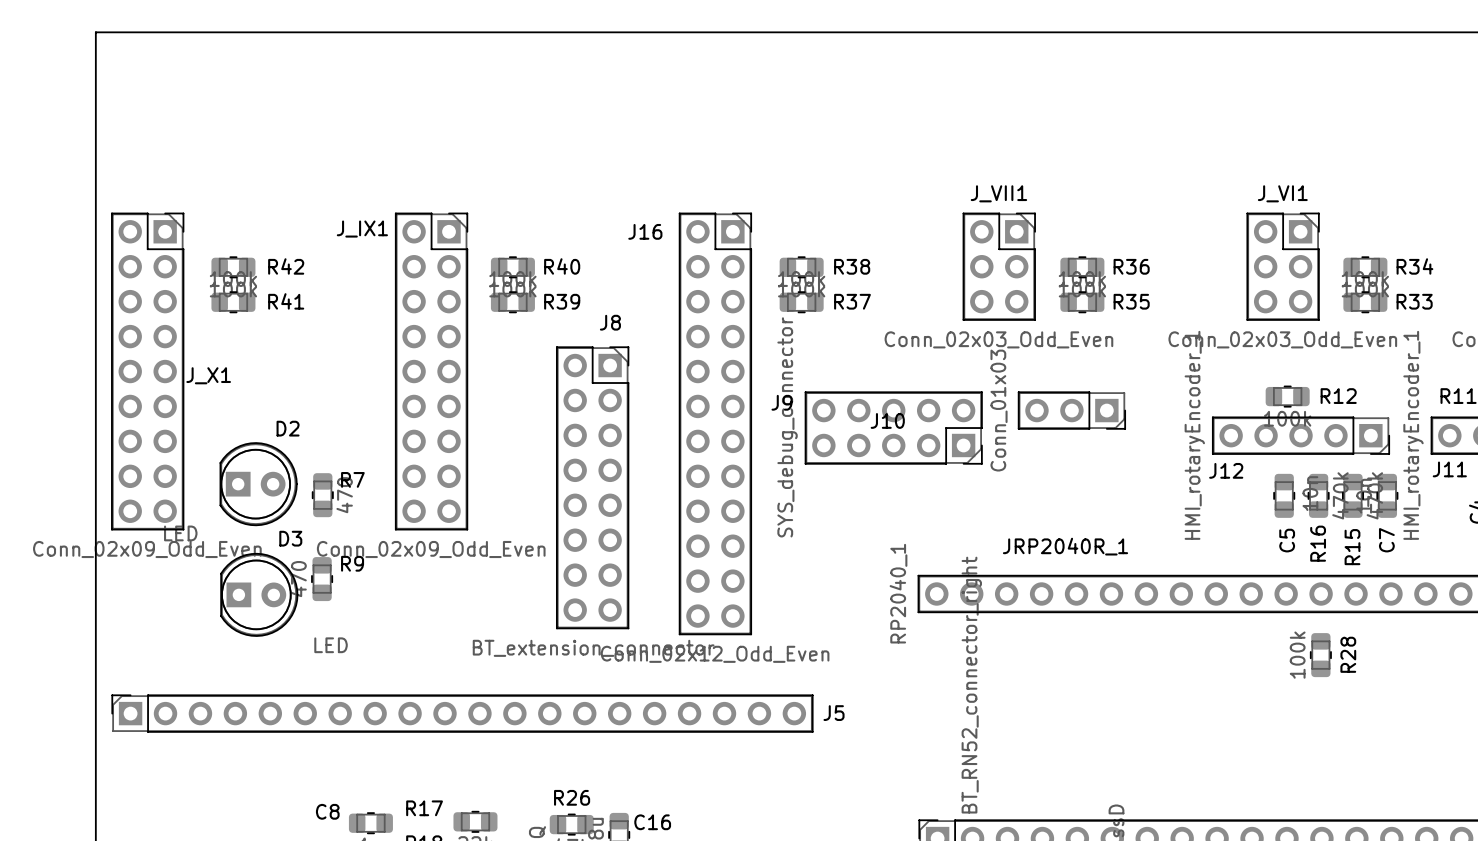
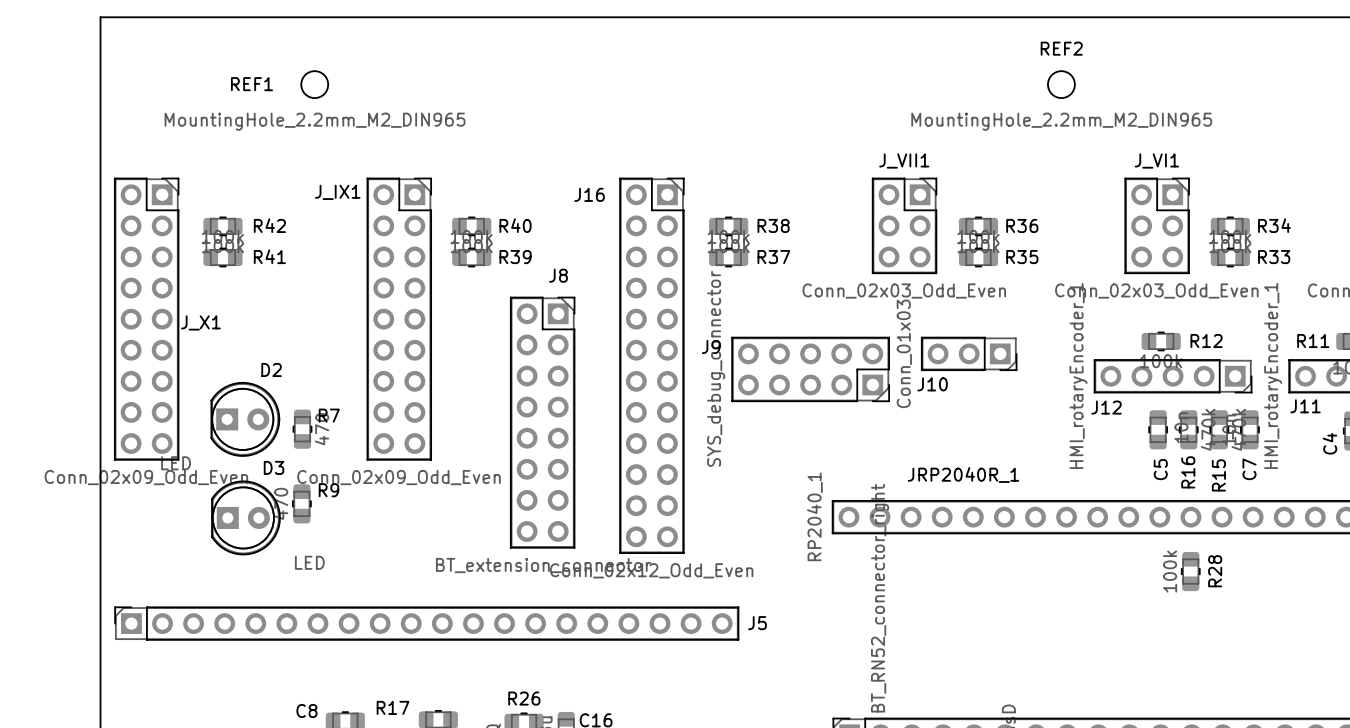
REF1: none -> MountingHole_2.2mm_M2_DIN965 (314, 84)
REF2: none -> MountingHole_2.2mm_M2_DIN965 (1061, 84)
J10 name position: J10 (887, 420) -> J10 (932, 384)

